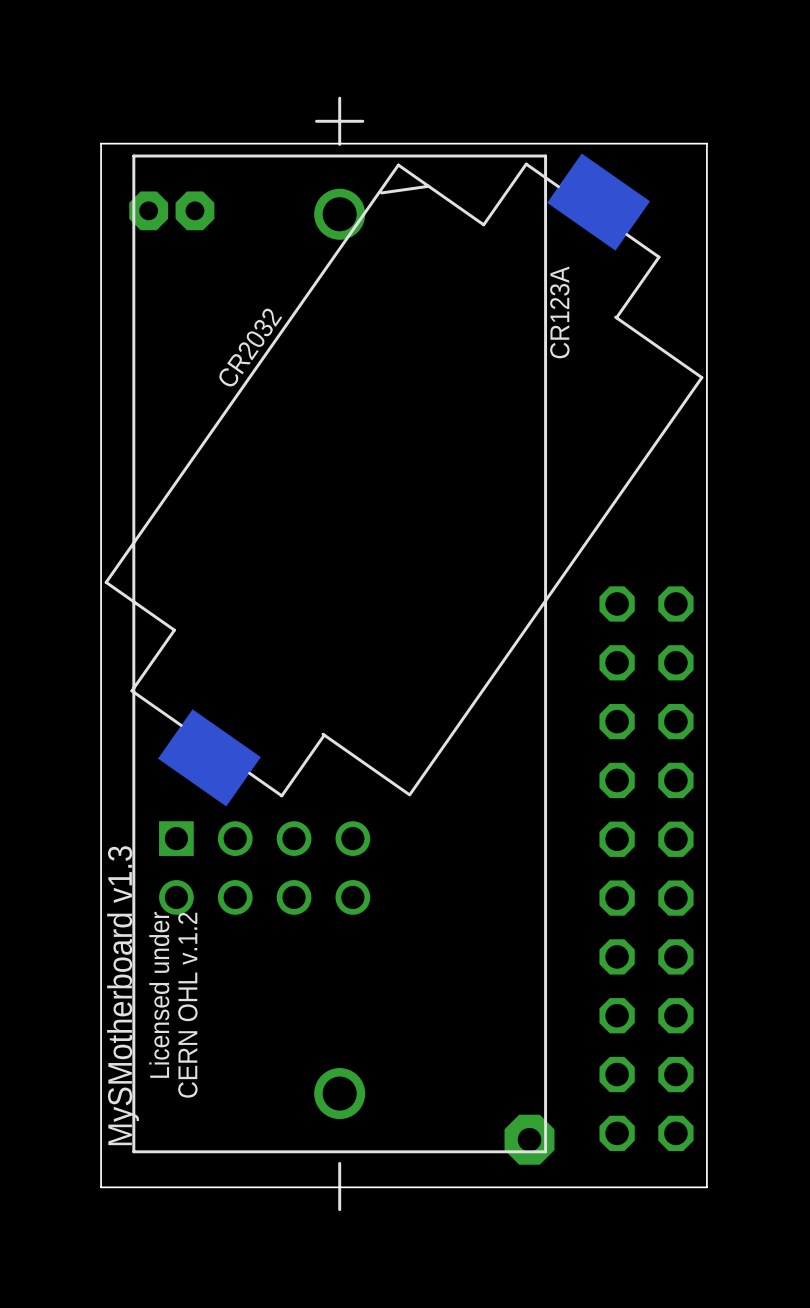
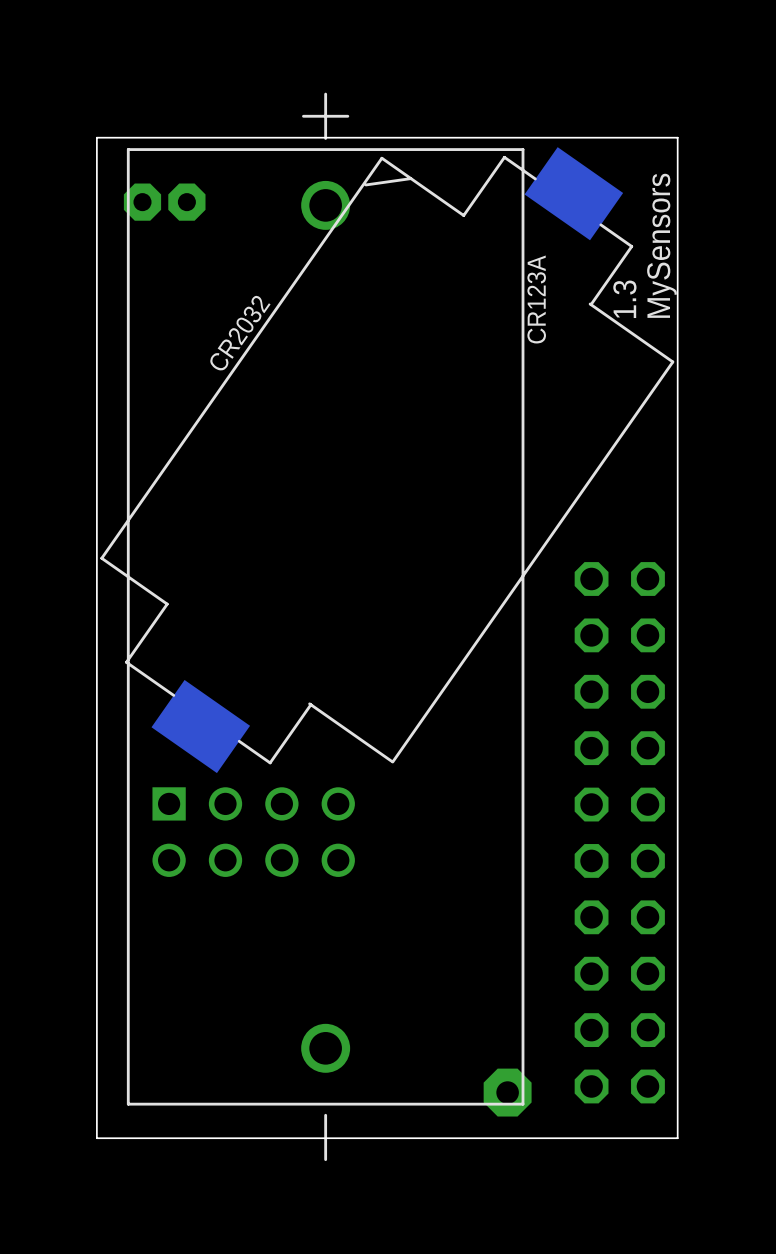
text: none -> MySensors (661, 245)
text: none -> 1.3 (624, 299)
text: Licensed under (159, 994) -> none
text: MySMotherboard v1.3 (123, 995) -> none
text: CERN OHL v.1.2 (187, 1005) -> none

